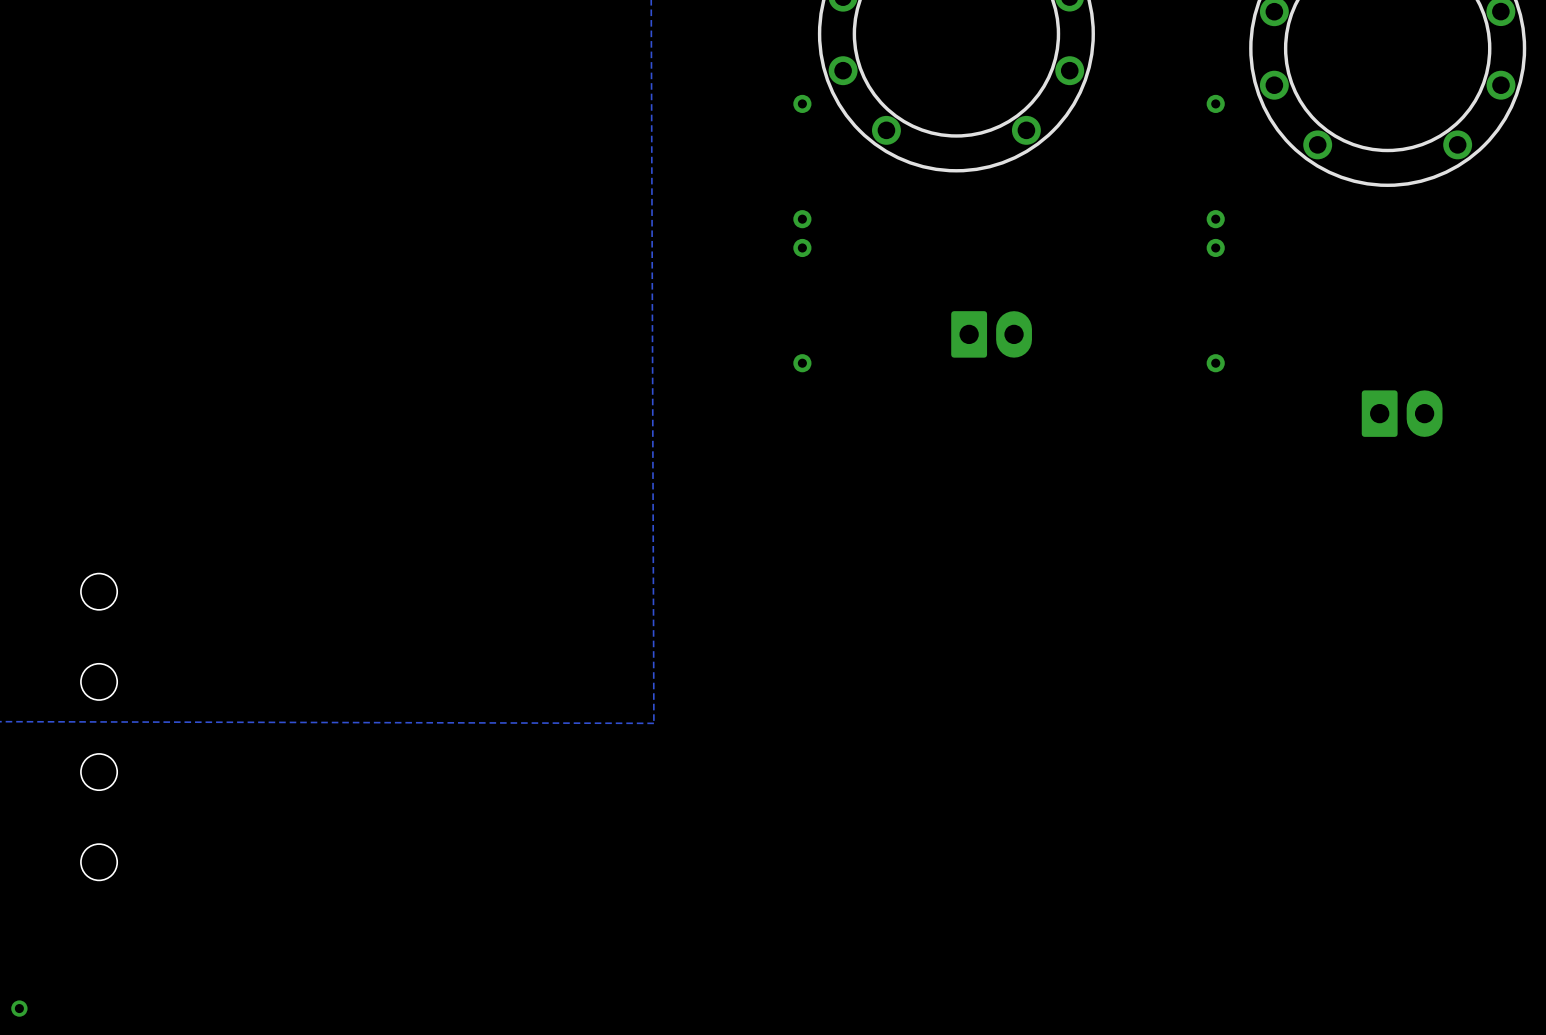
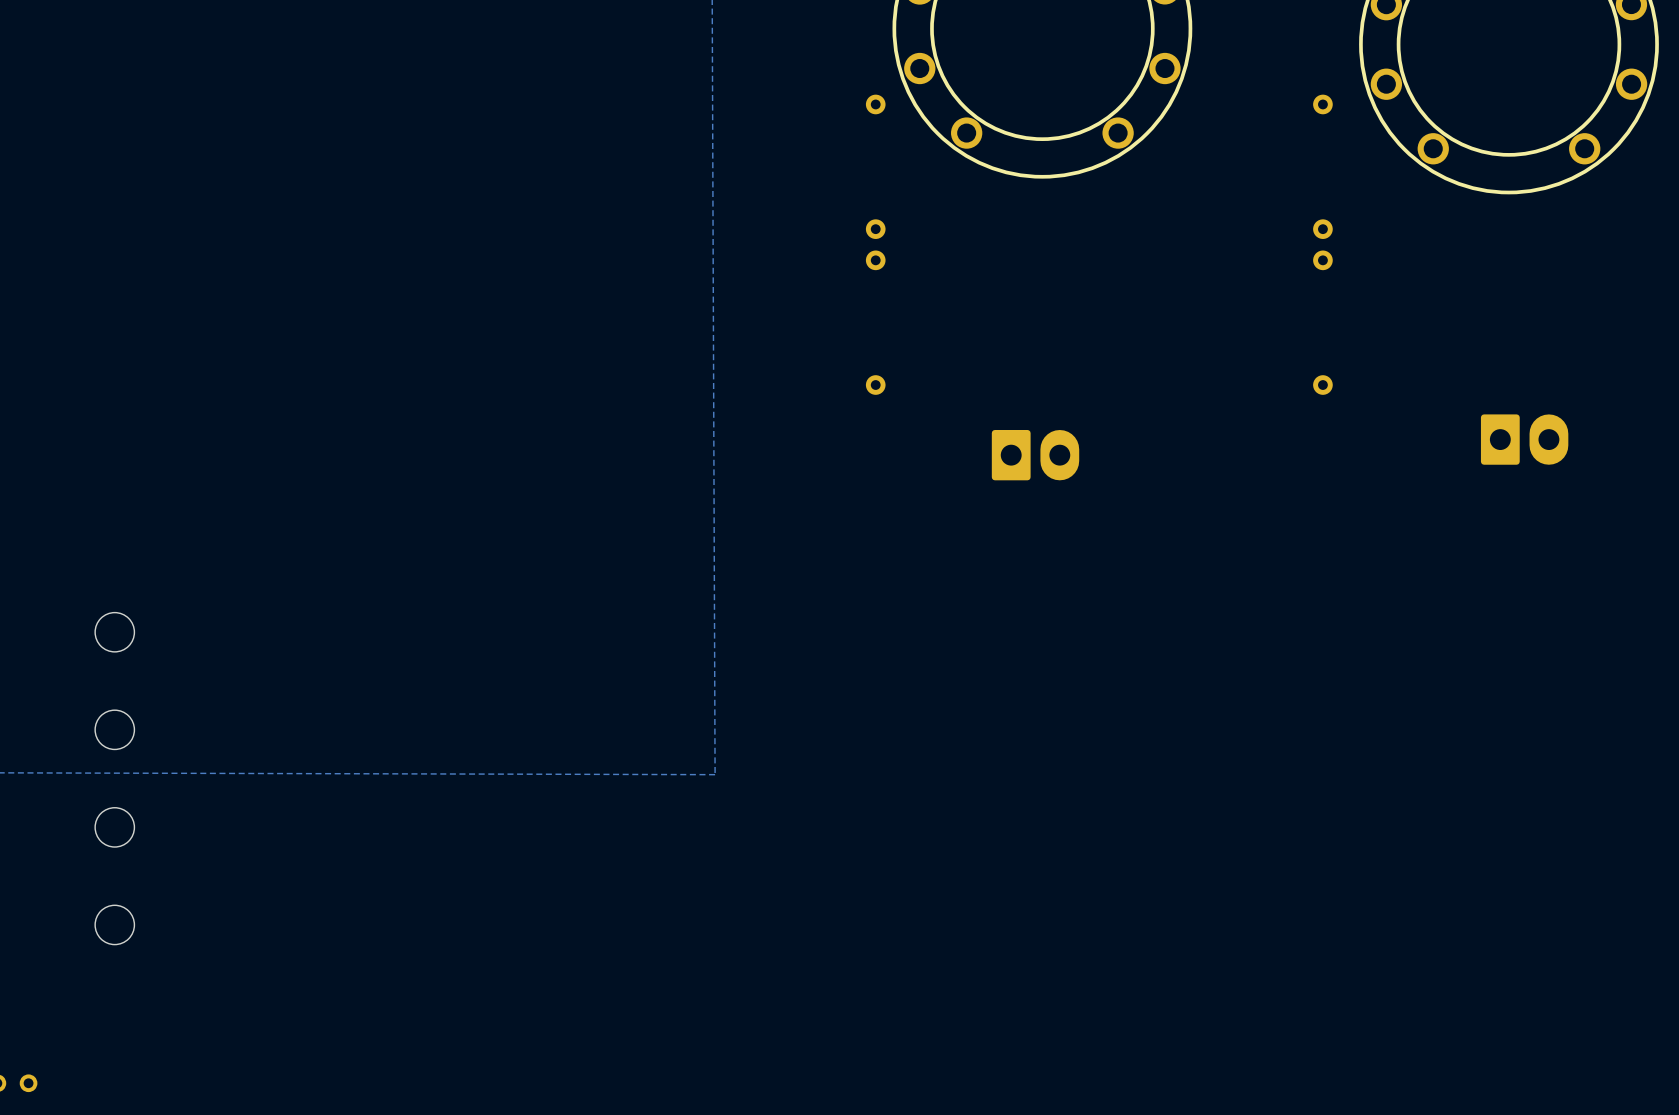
part position: (991, 334) -> (1035, 455)

